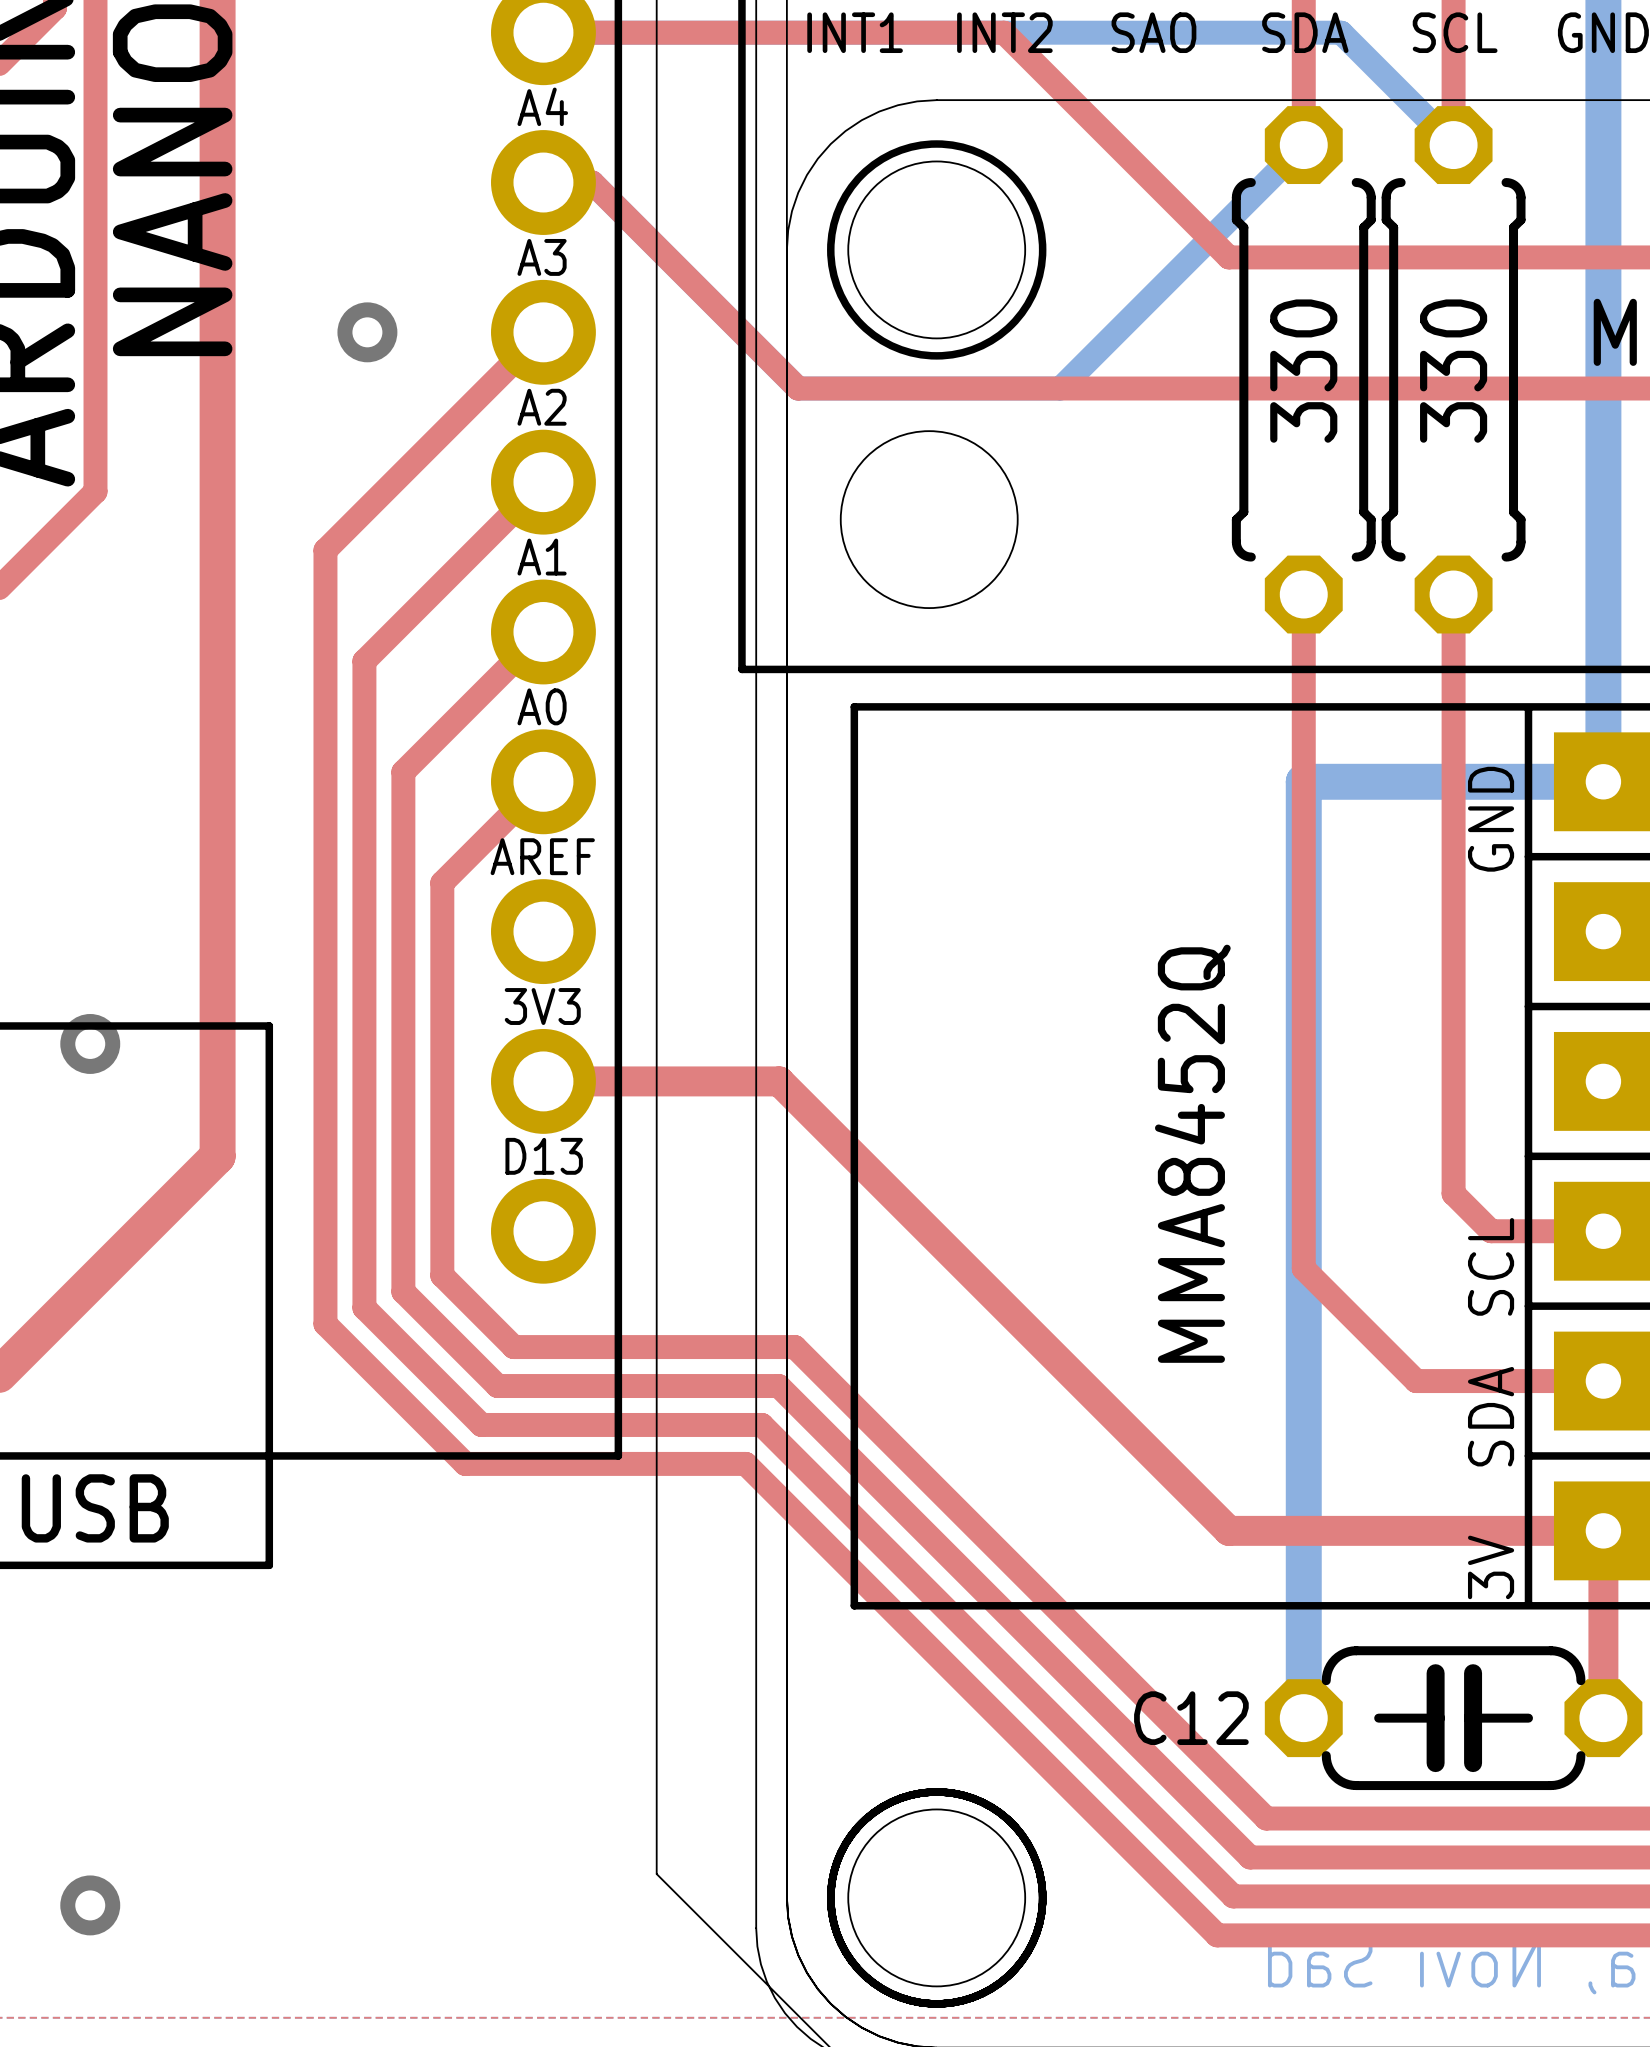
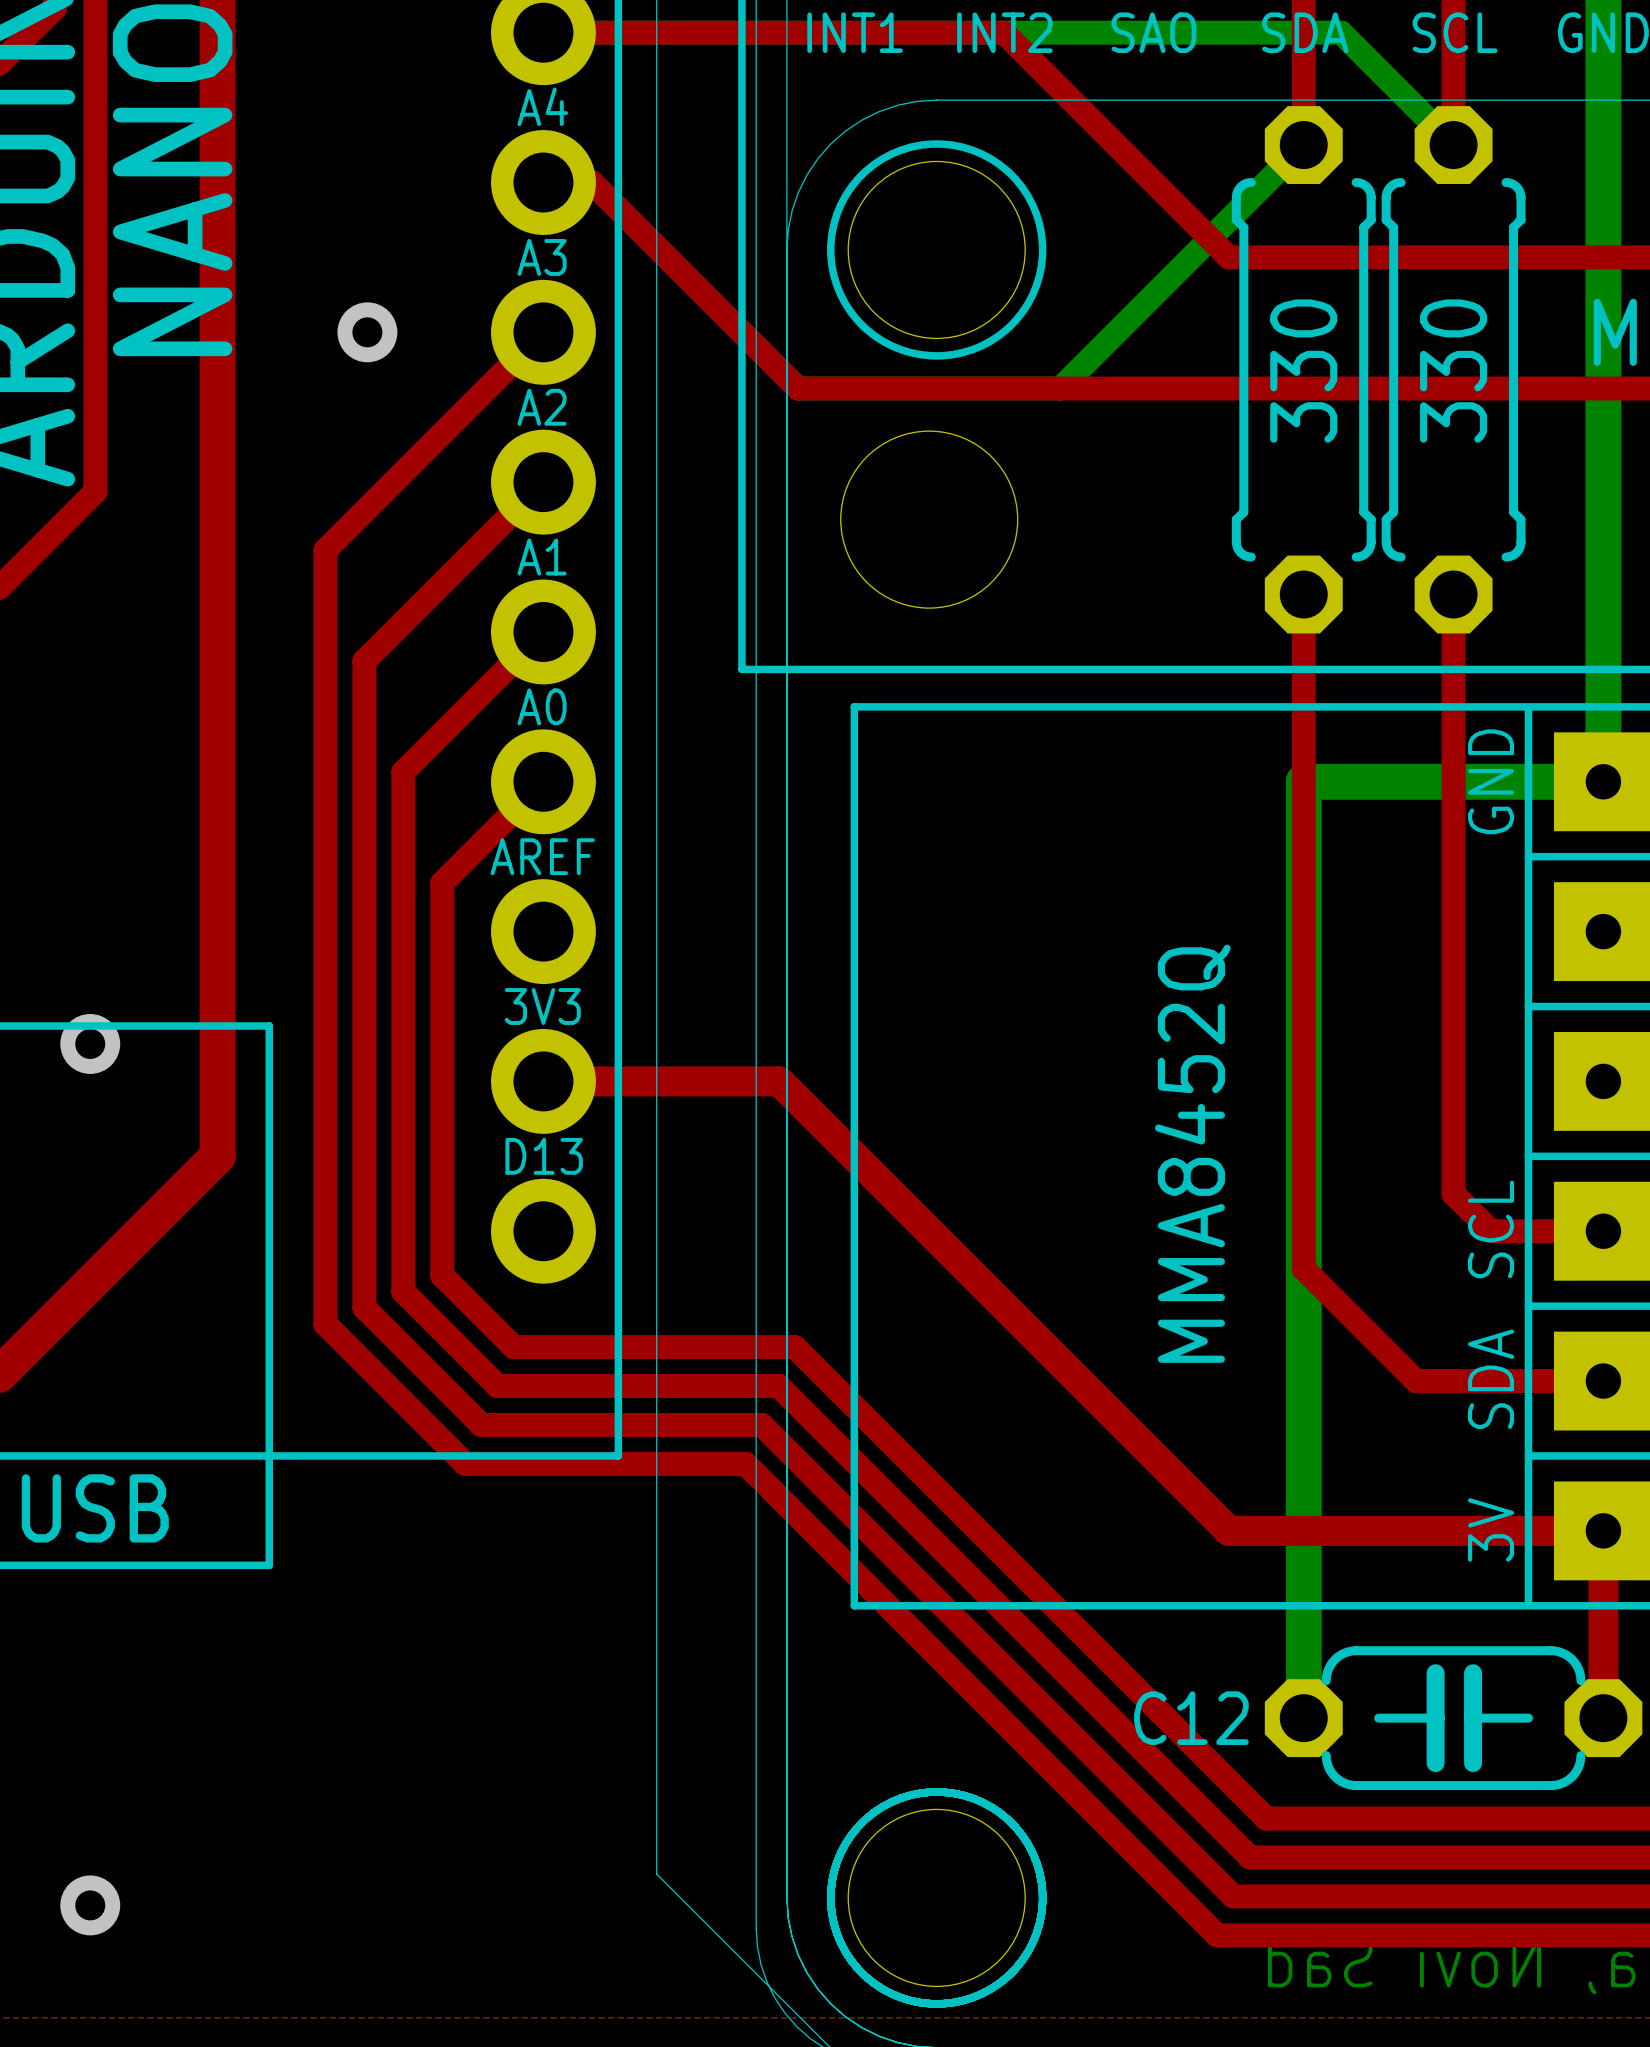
text position: GND (1491, 819) -> GND (1491, 781)
text position: SCL (1491, 1266) -> SCL (1491, 1229)
text position: SDA (1491, 1416) -> SDA (1491, 1379)
text position: 3V (1491, 1567) -> 3V (1491, 1529)

